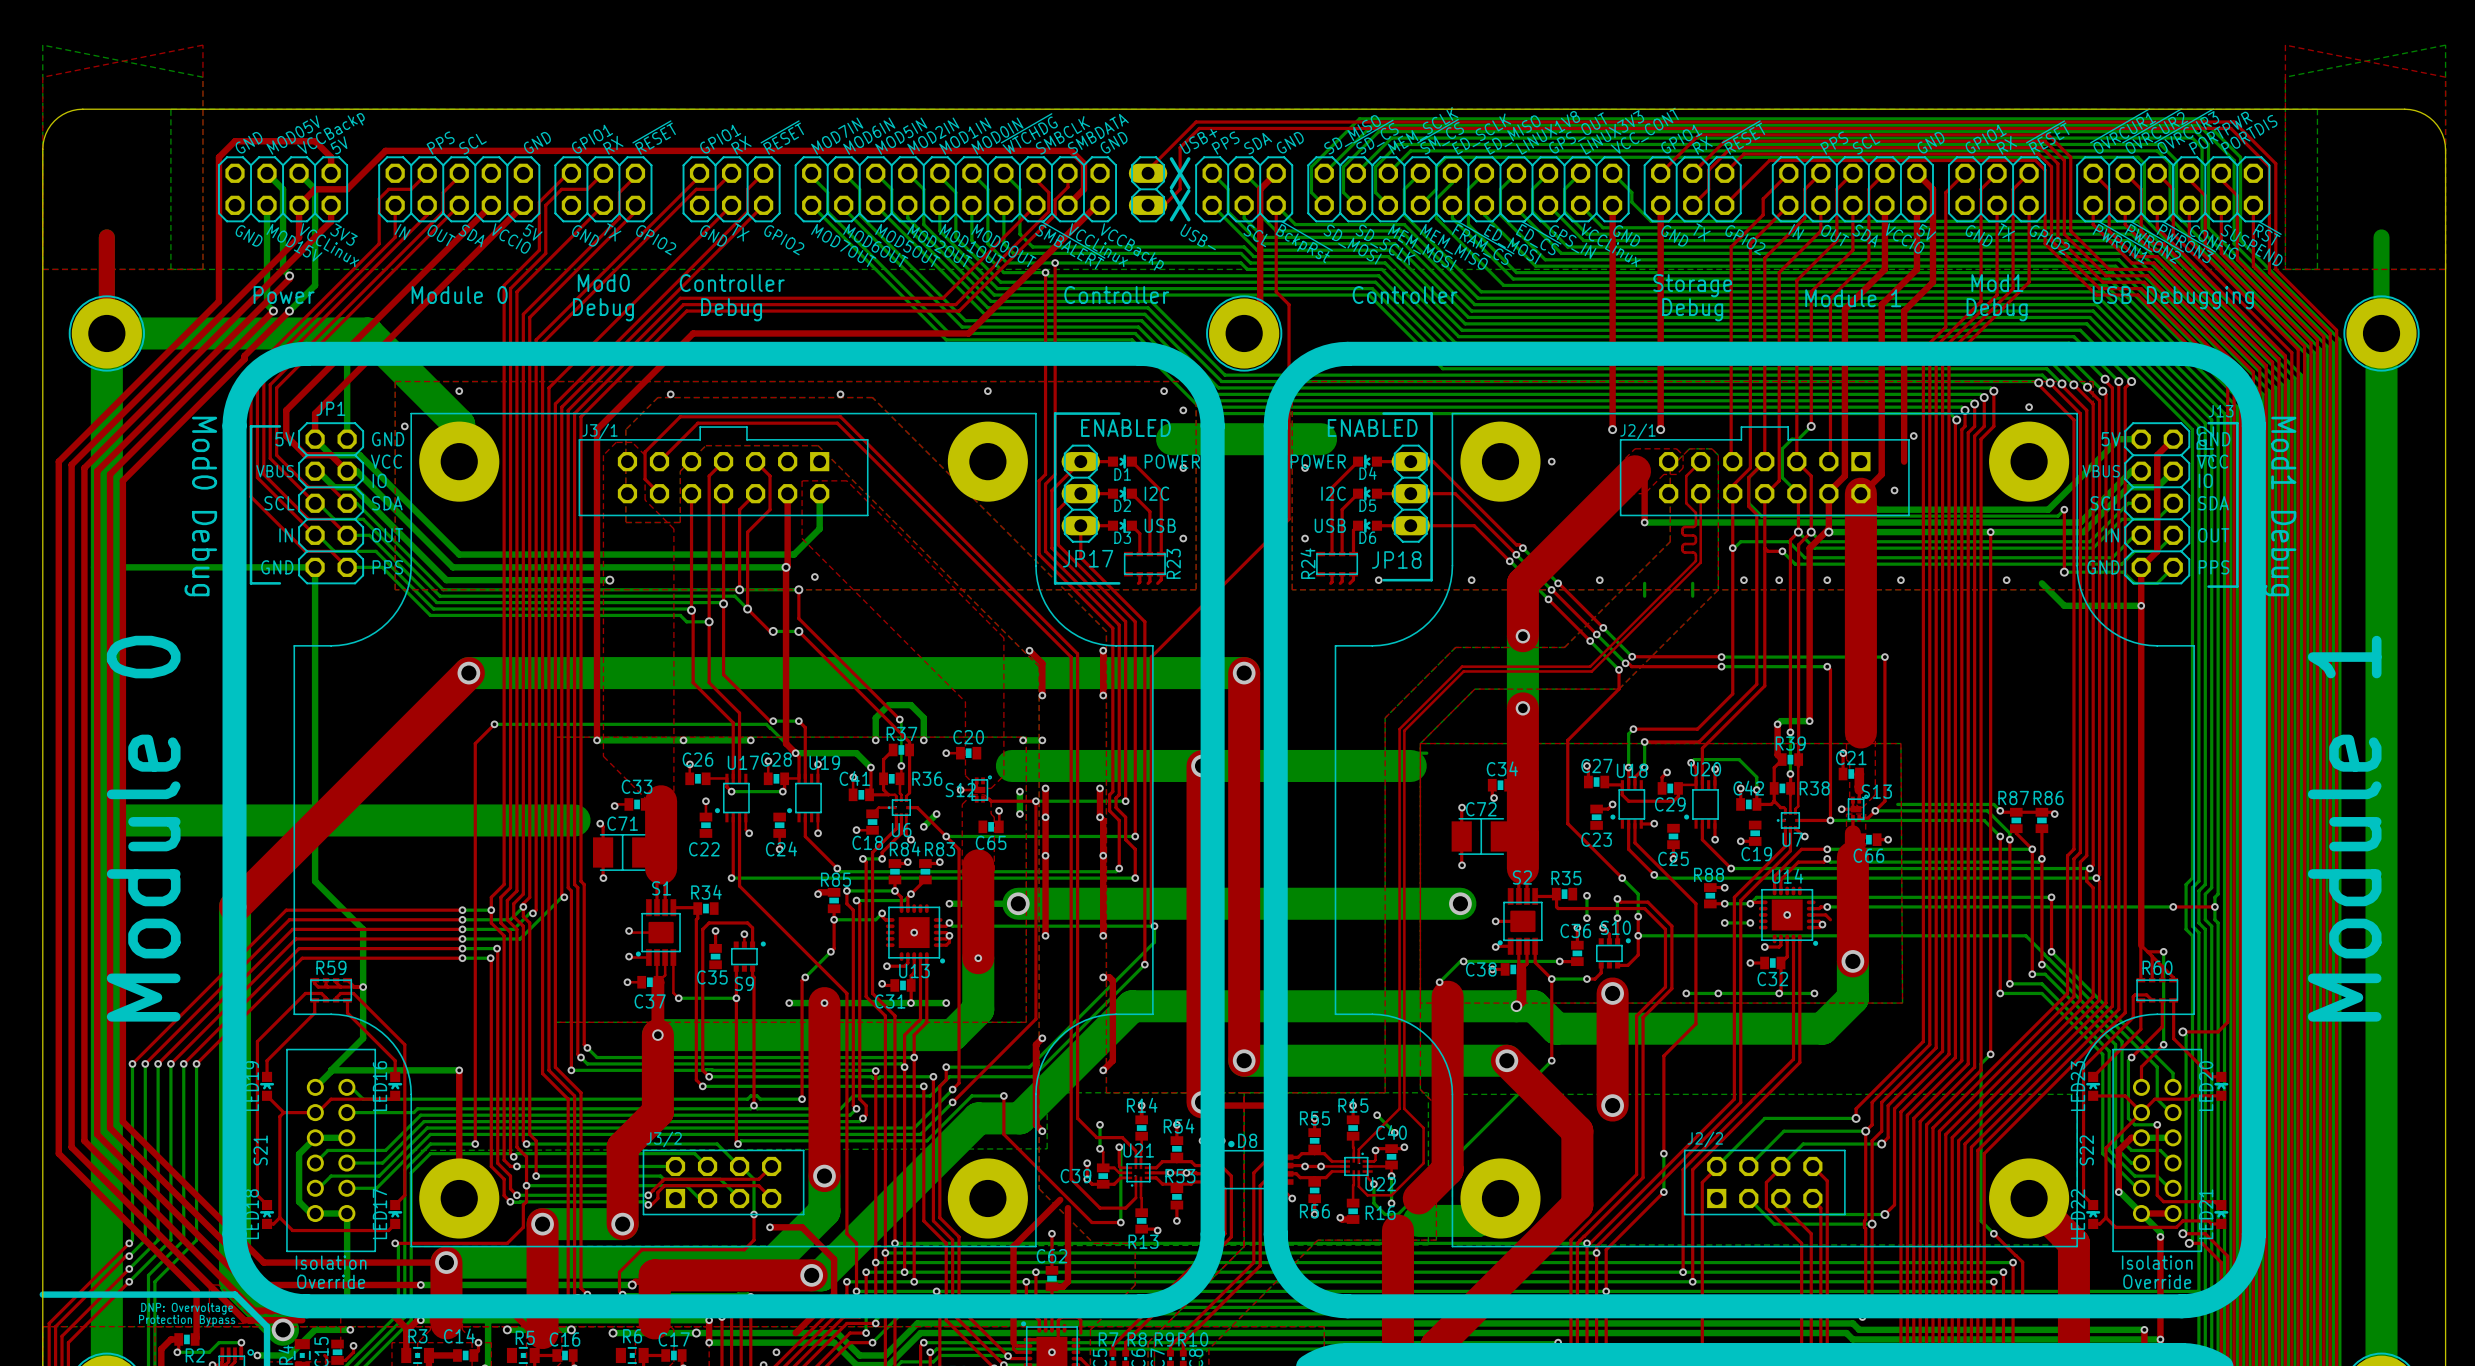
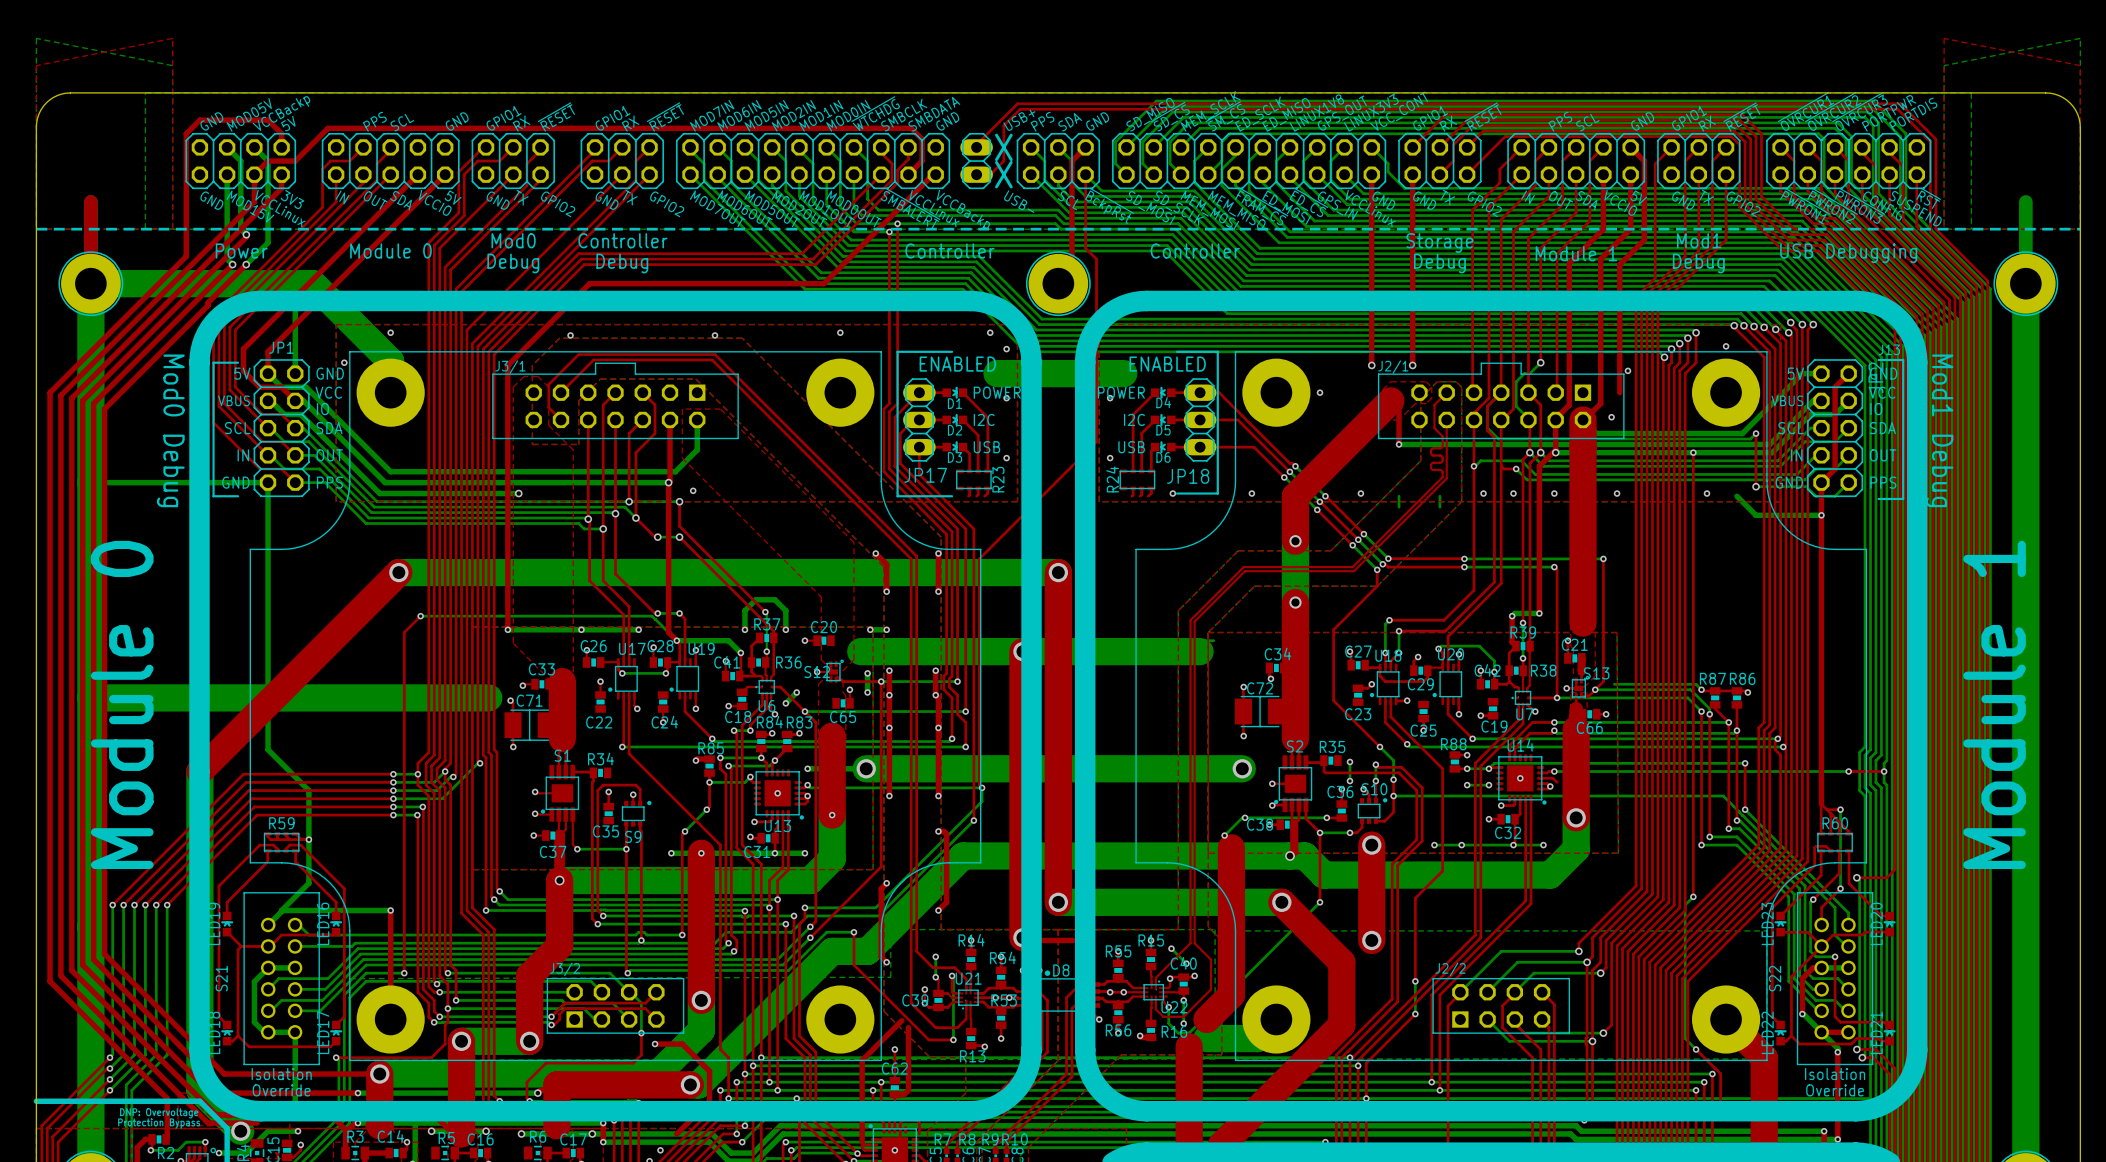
line: none -> (36, 229) (2080, 229)

